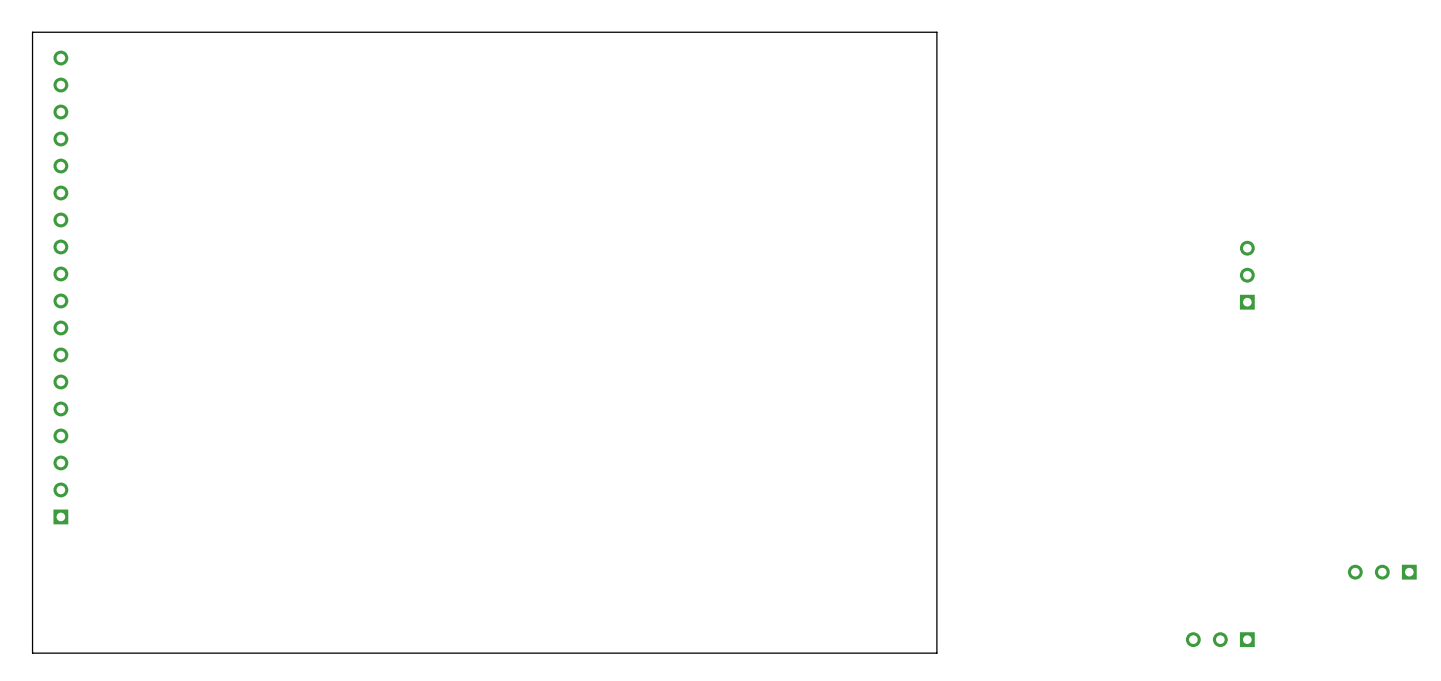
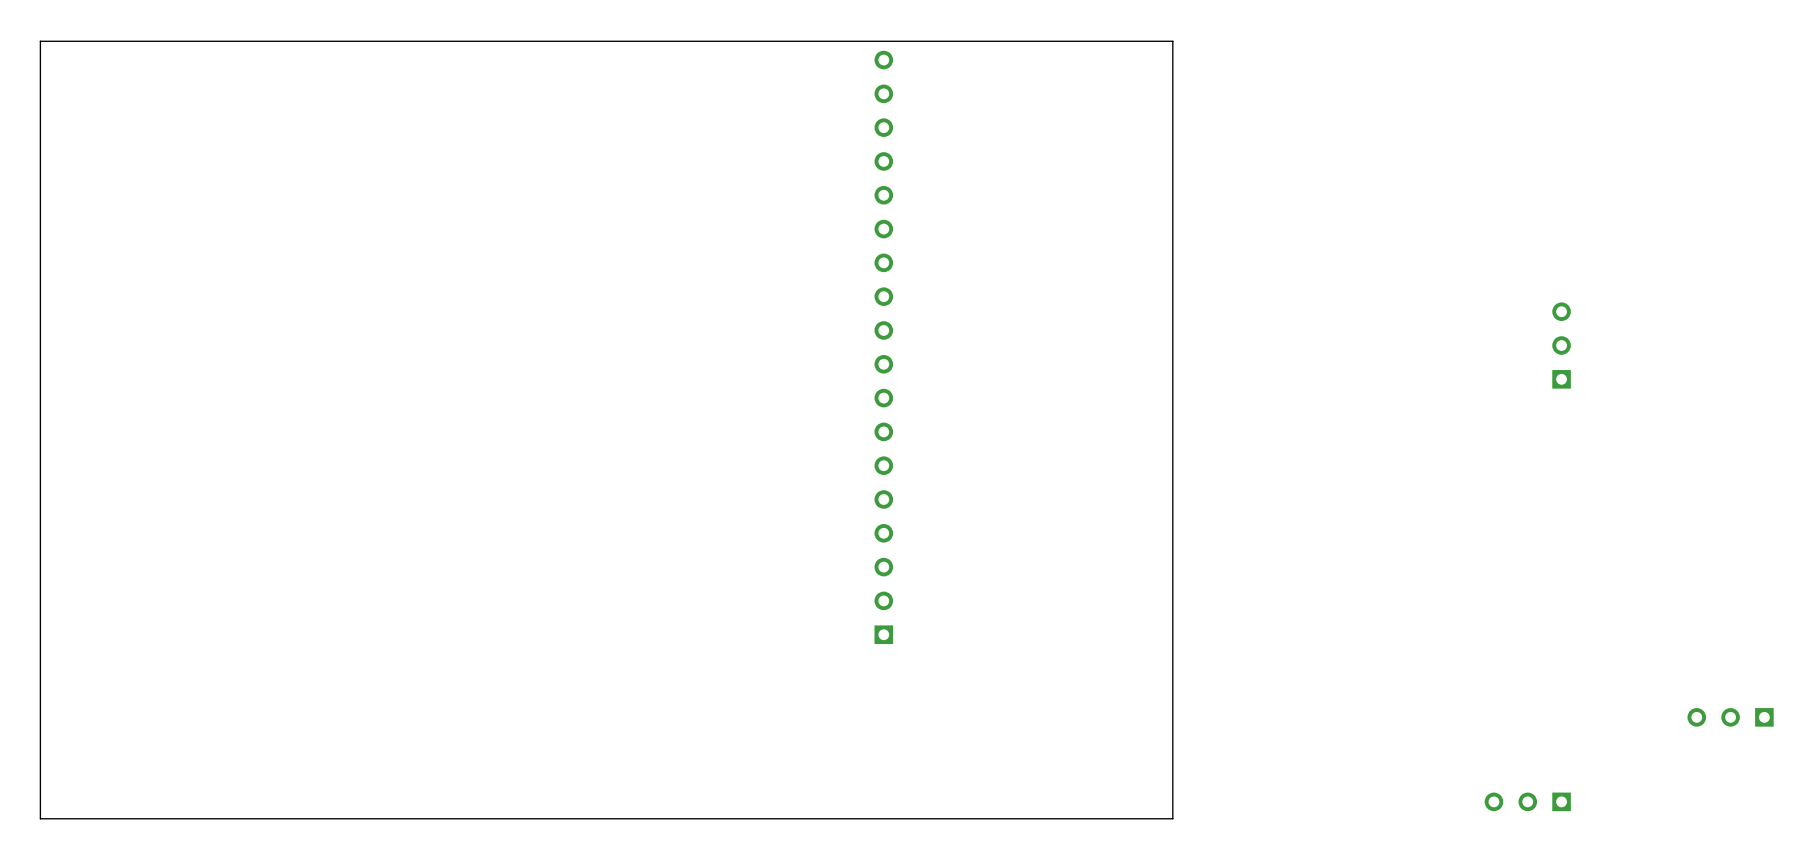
part: none -> (883, 347)
part: (60, 287) -> none

